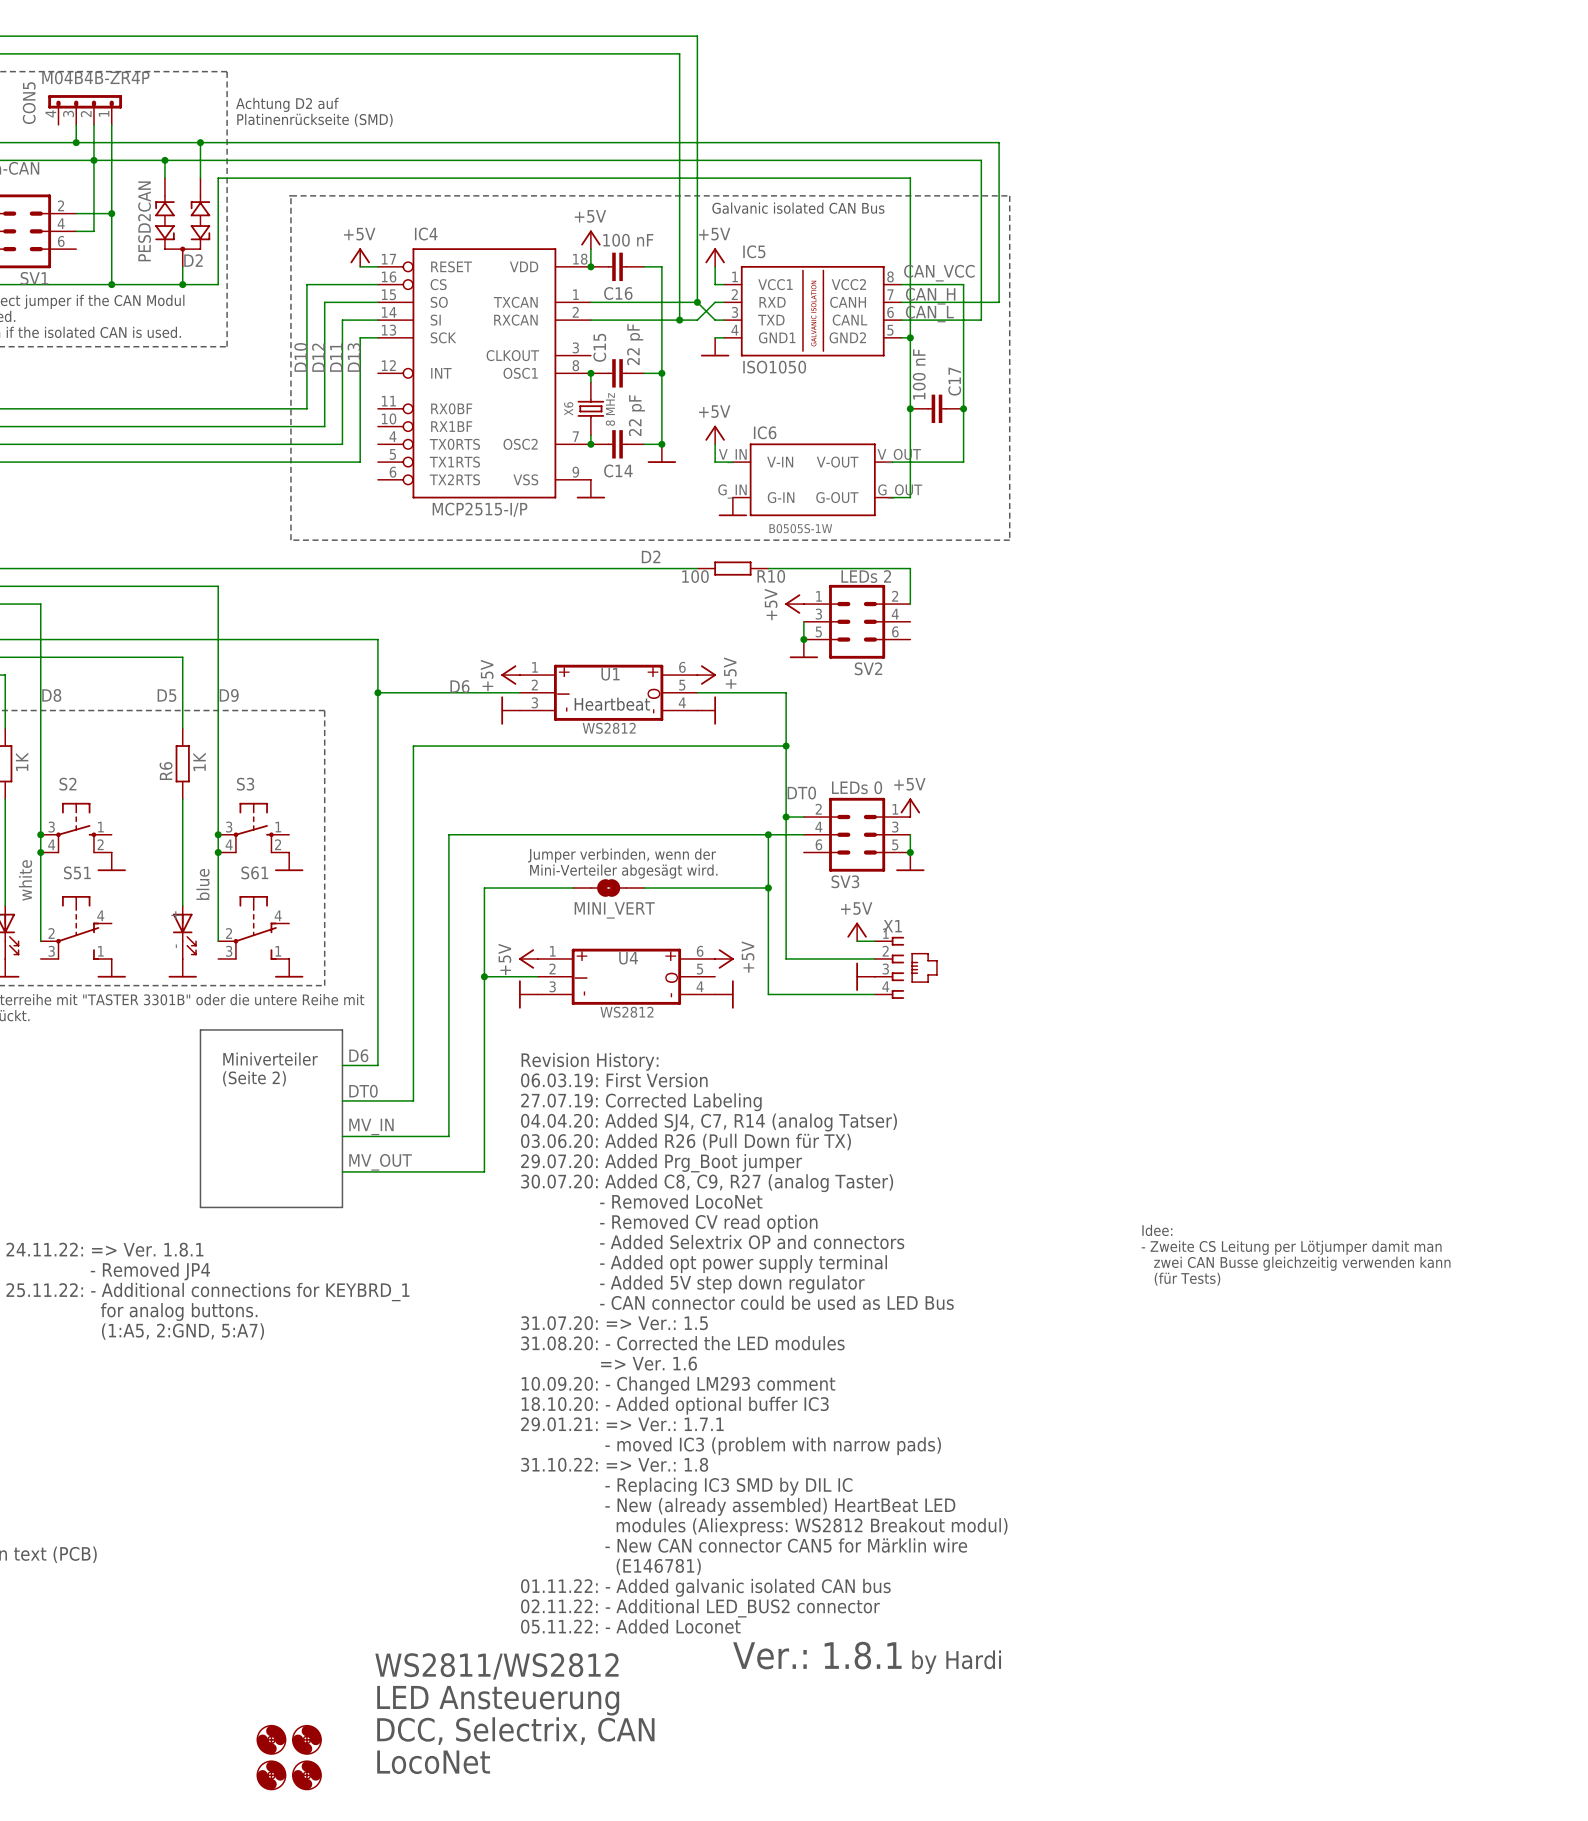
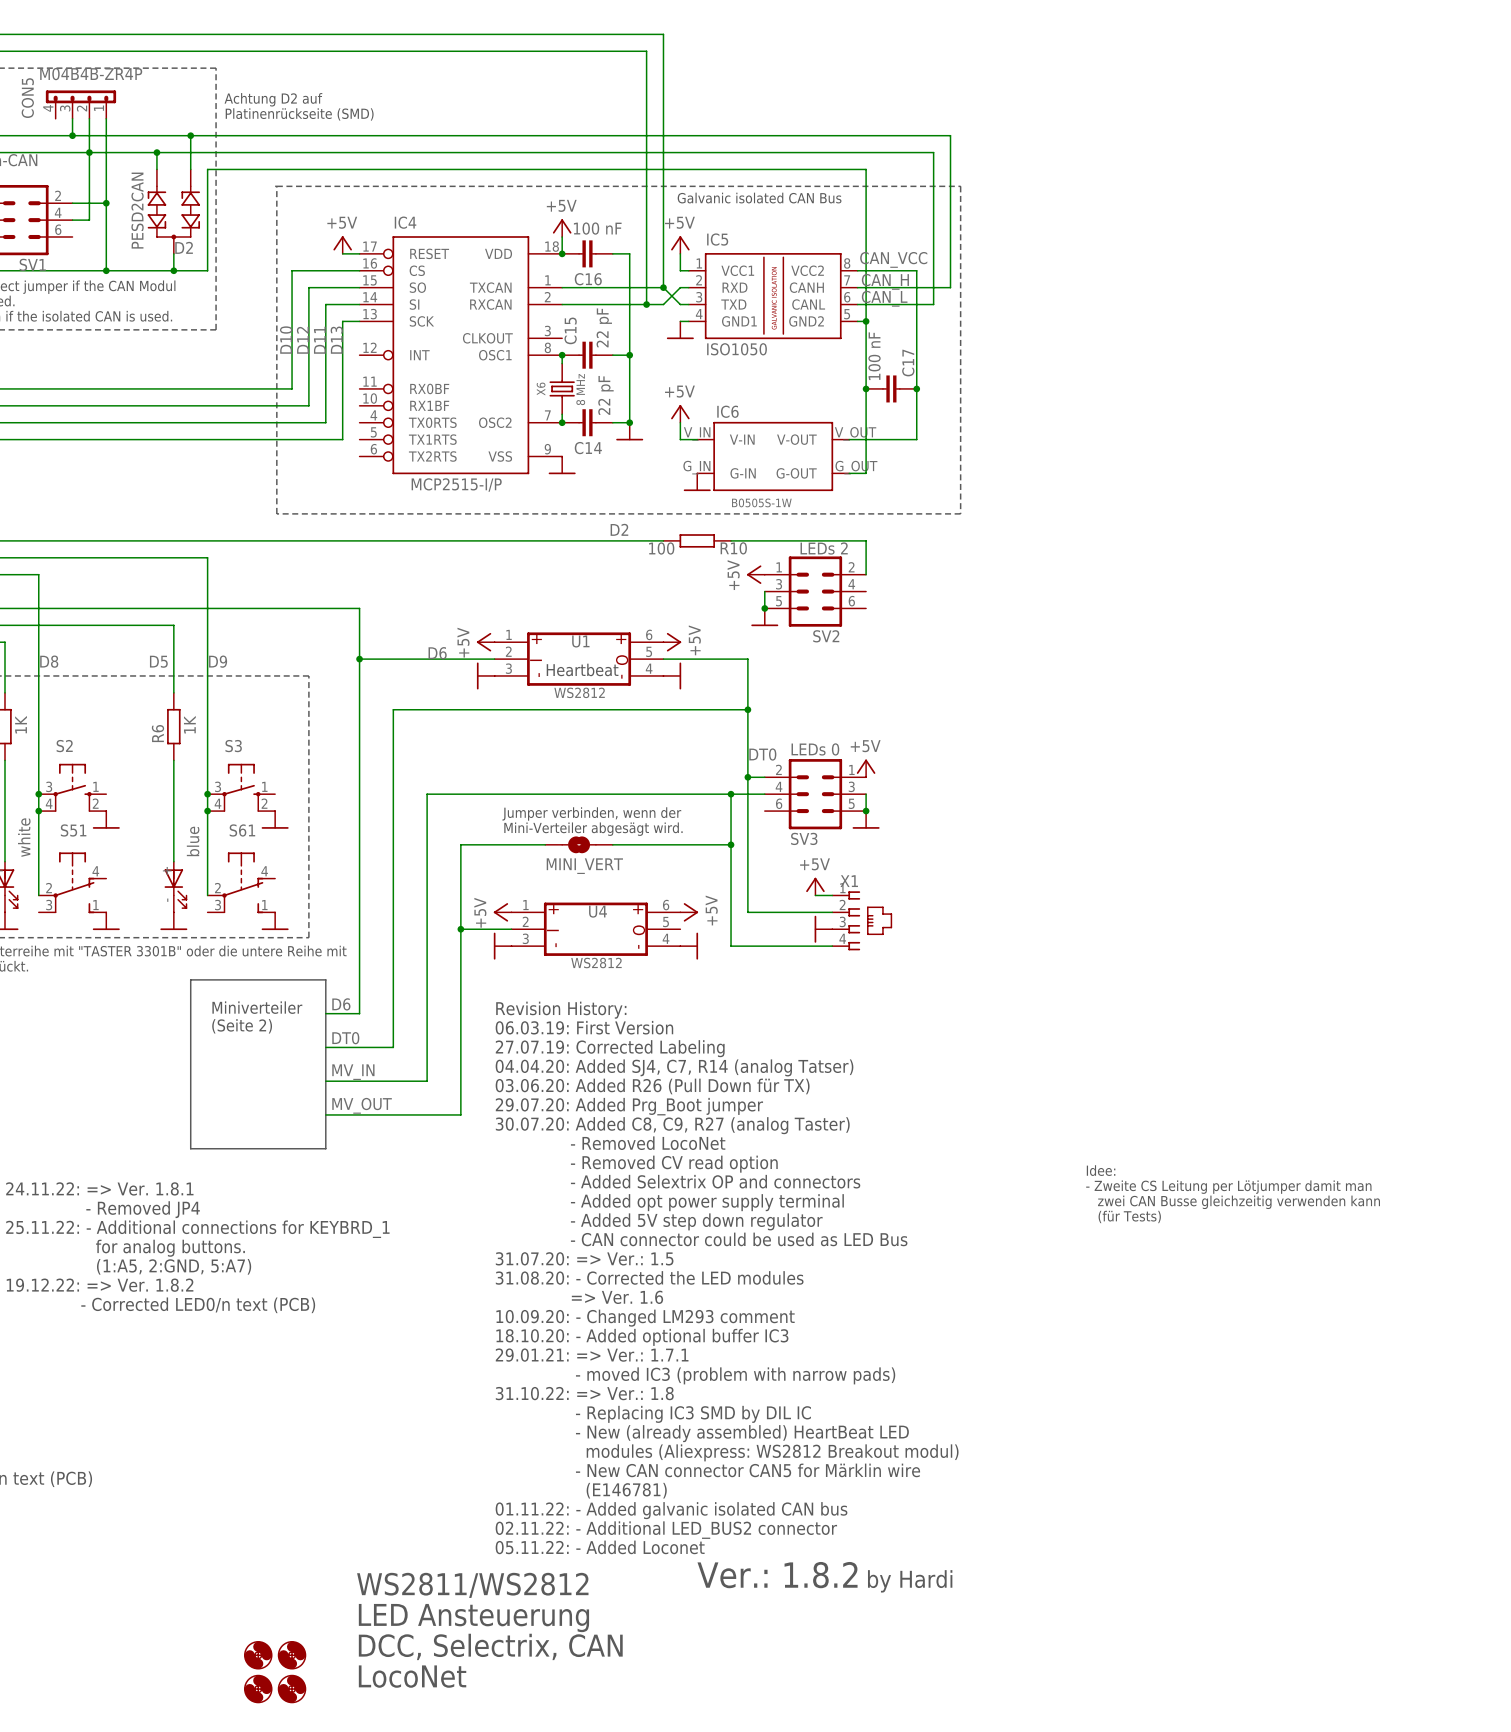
text: none -> 19.12.22: => Ver. 1.8.2 (100, 1285)
text: none -> - Corrected LED0/n text (PCB) (198, 1305)
text: Ver.: 1.8.1 (817, 1655) -> Ver.: 1.8.2 (777, 1575)

